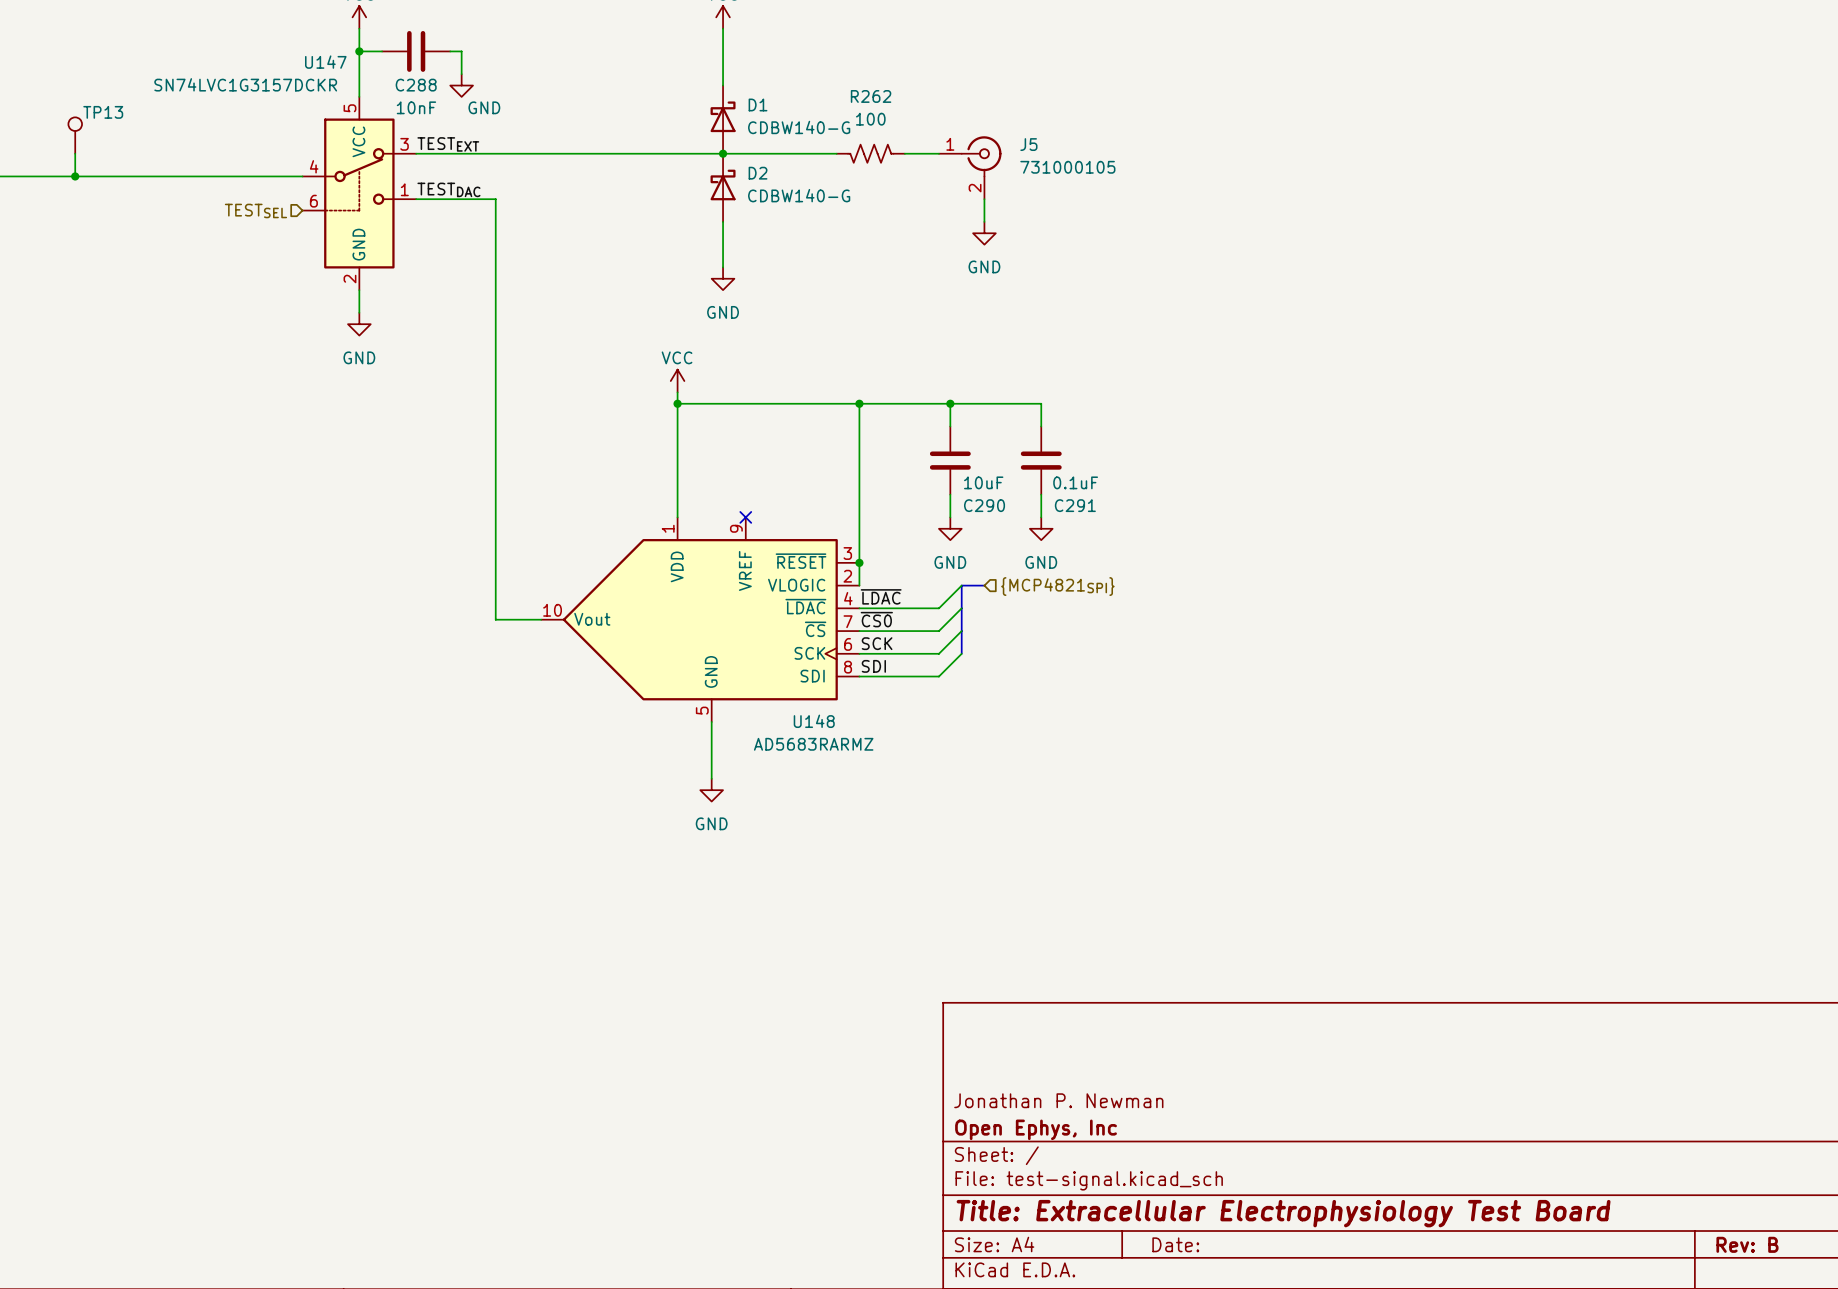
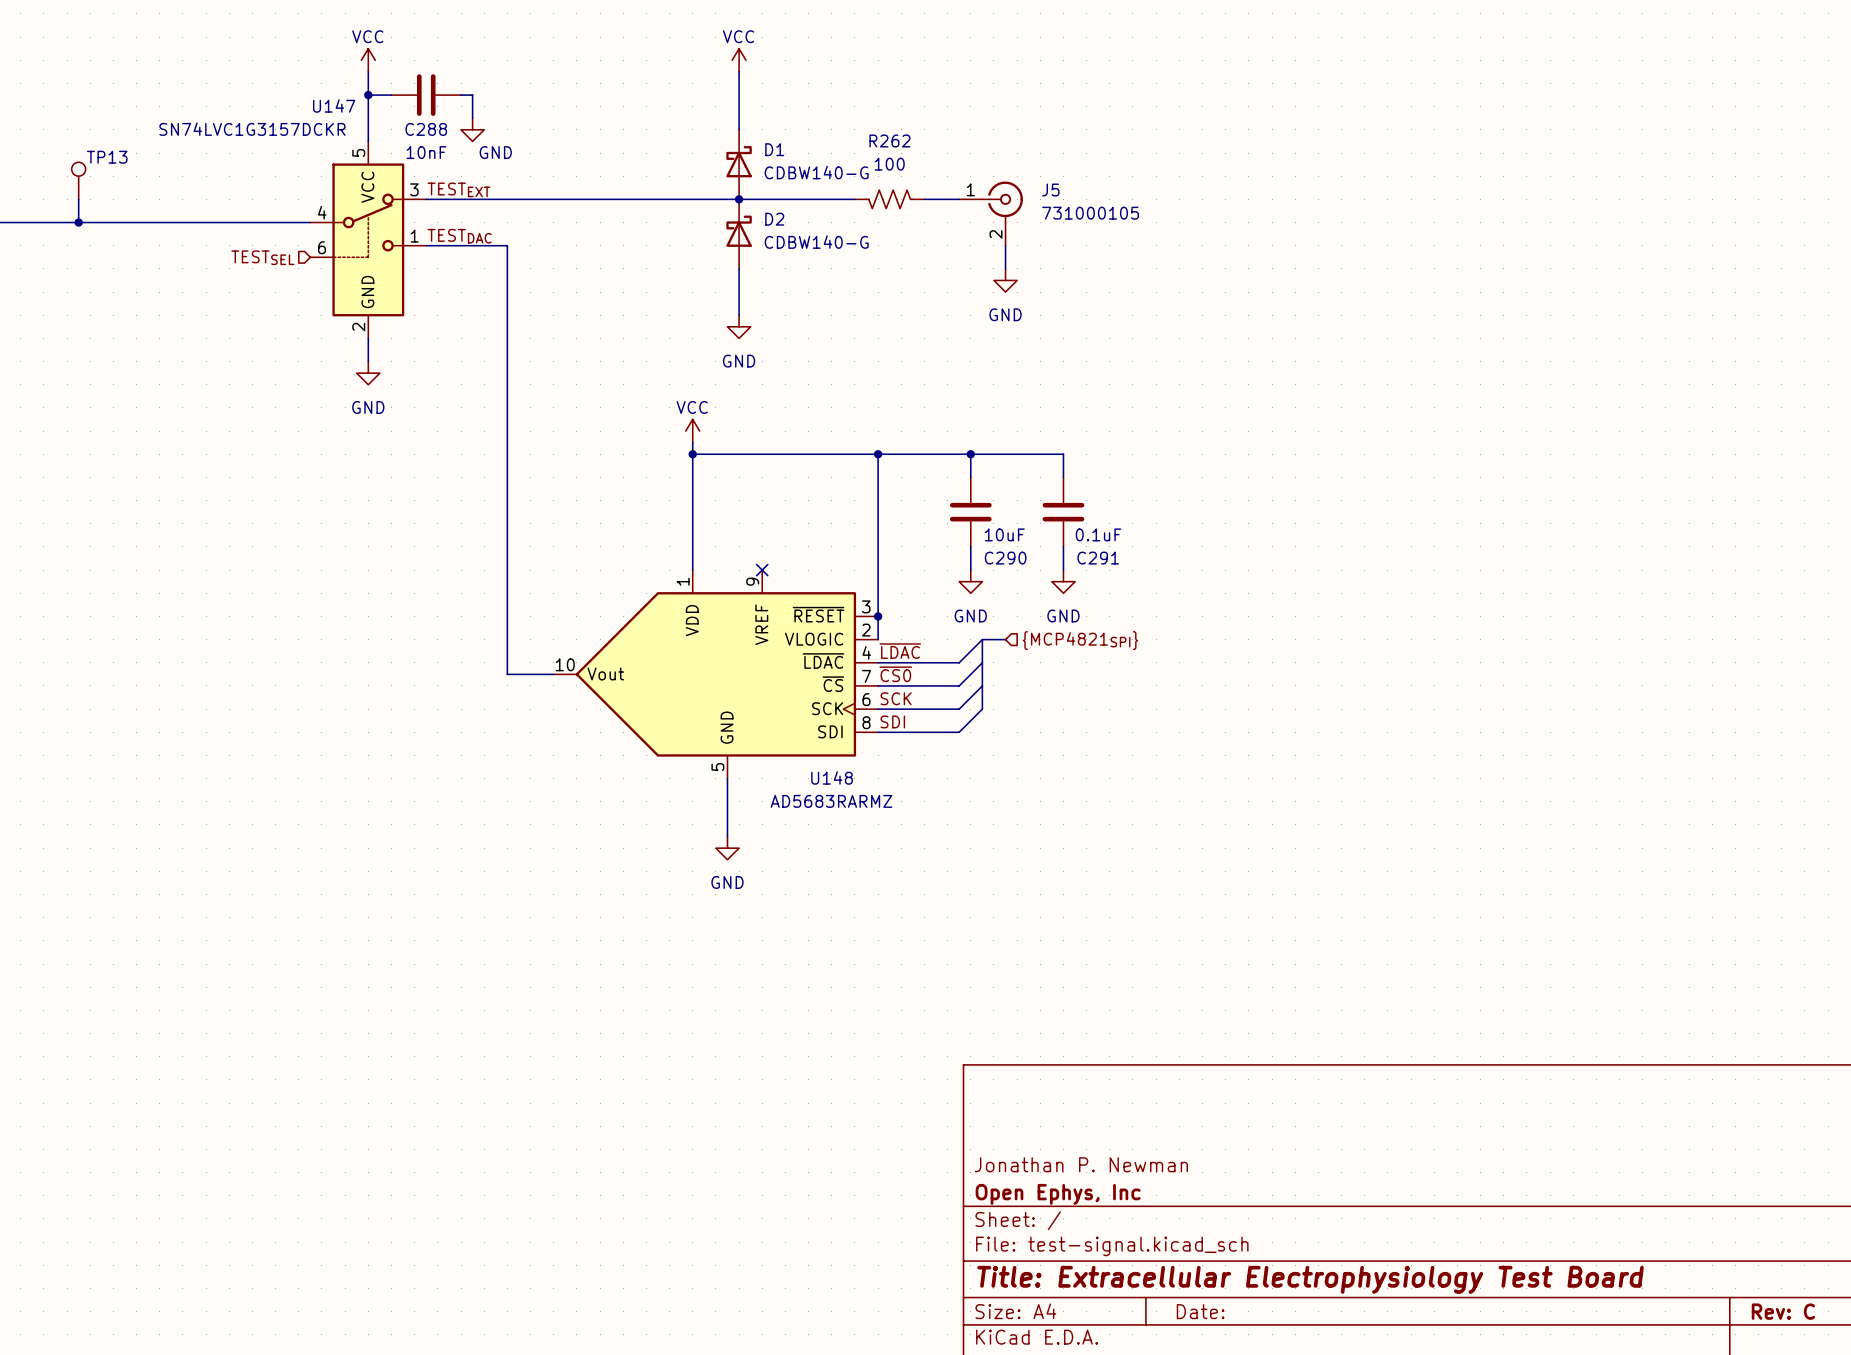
title block: Rev: B (1747, 1244) -> Rev: C (1783, 1311)

